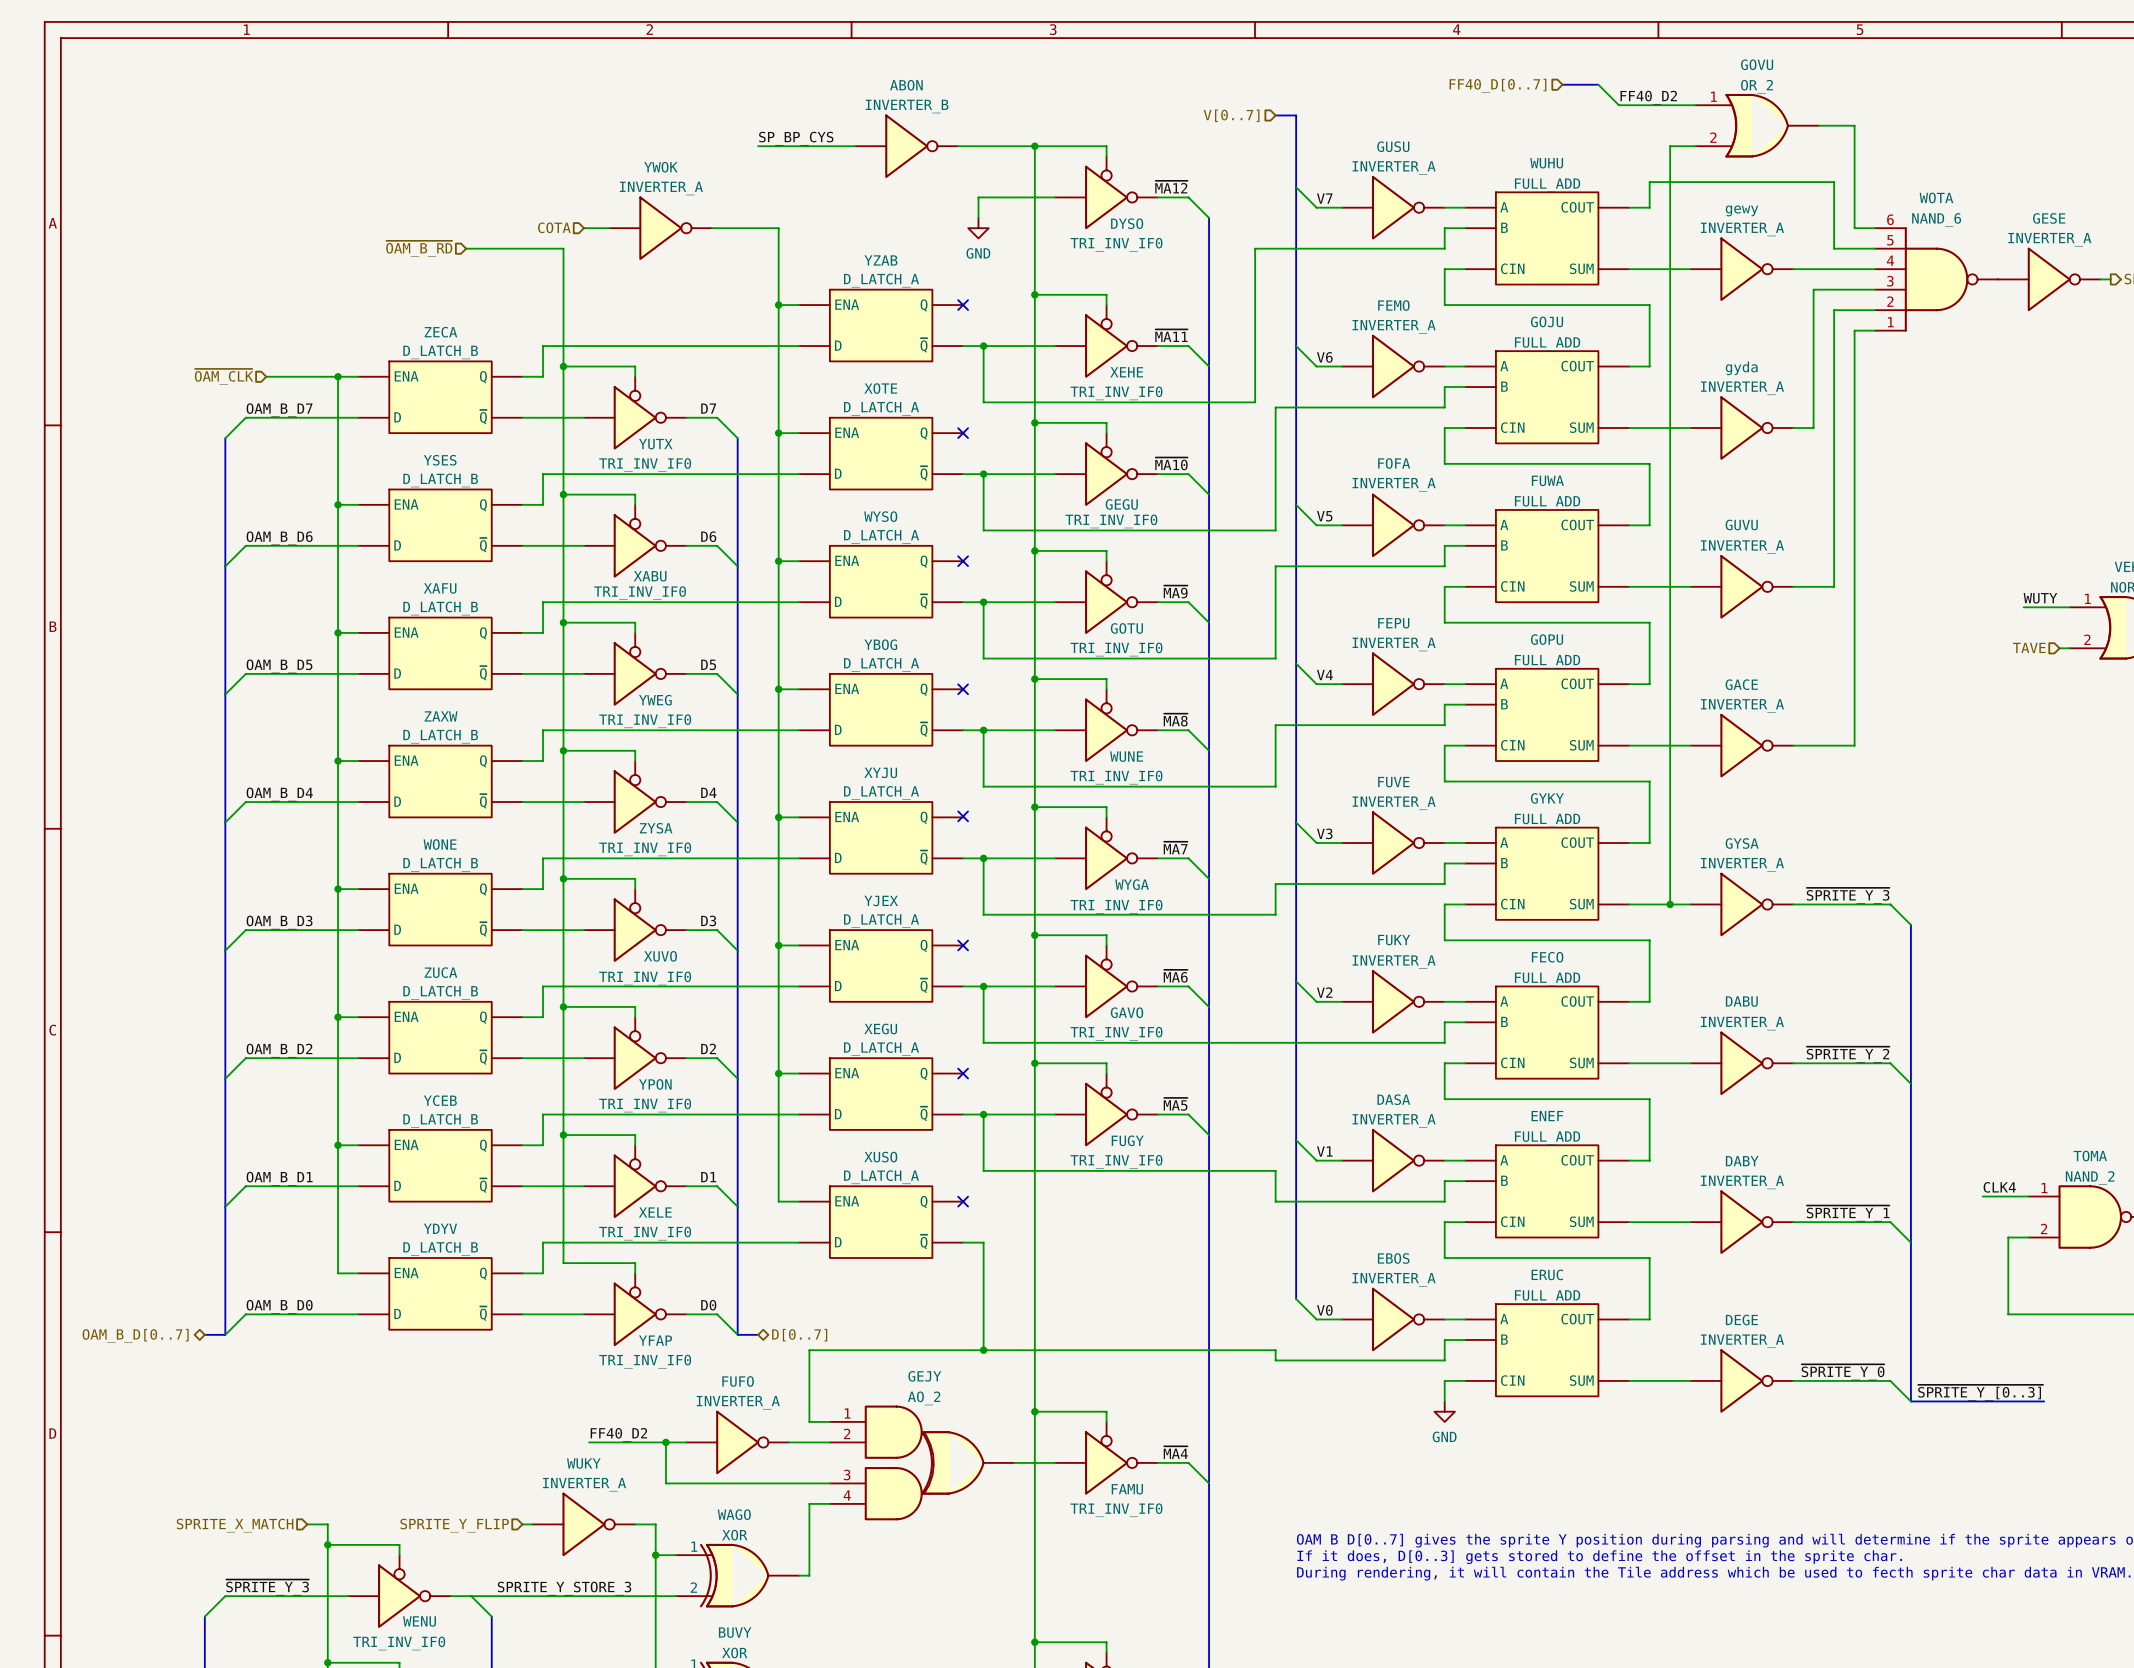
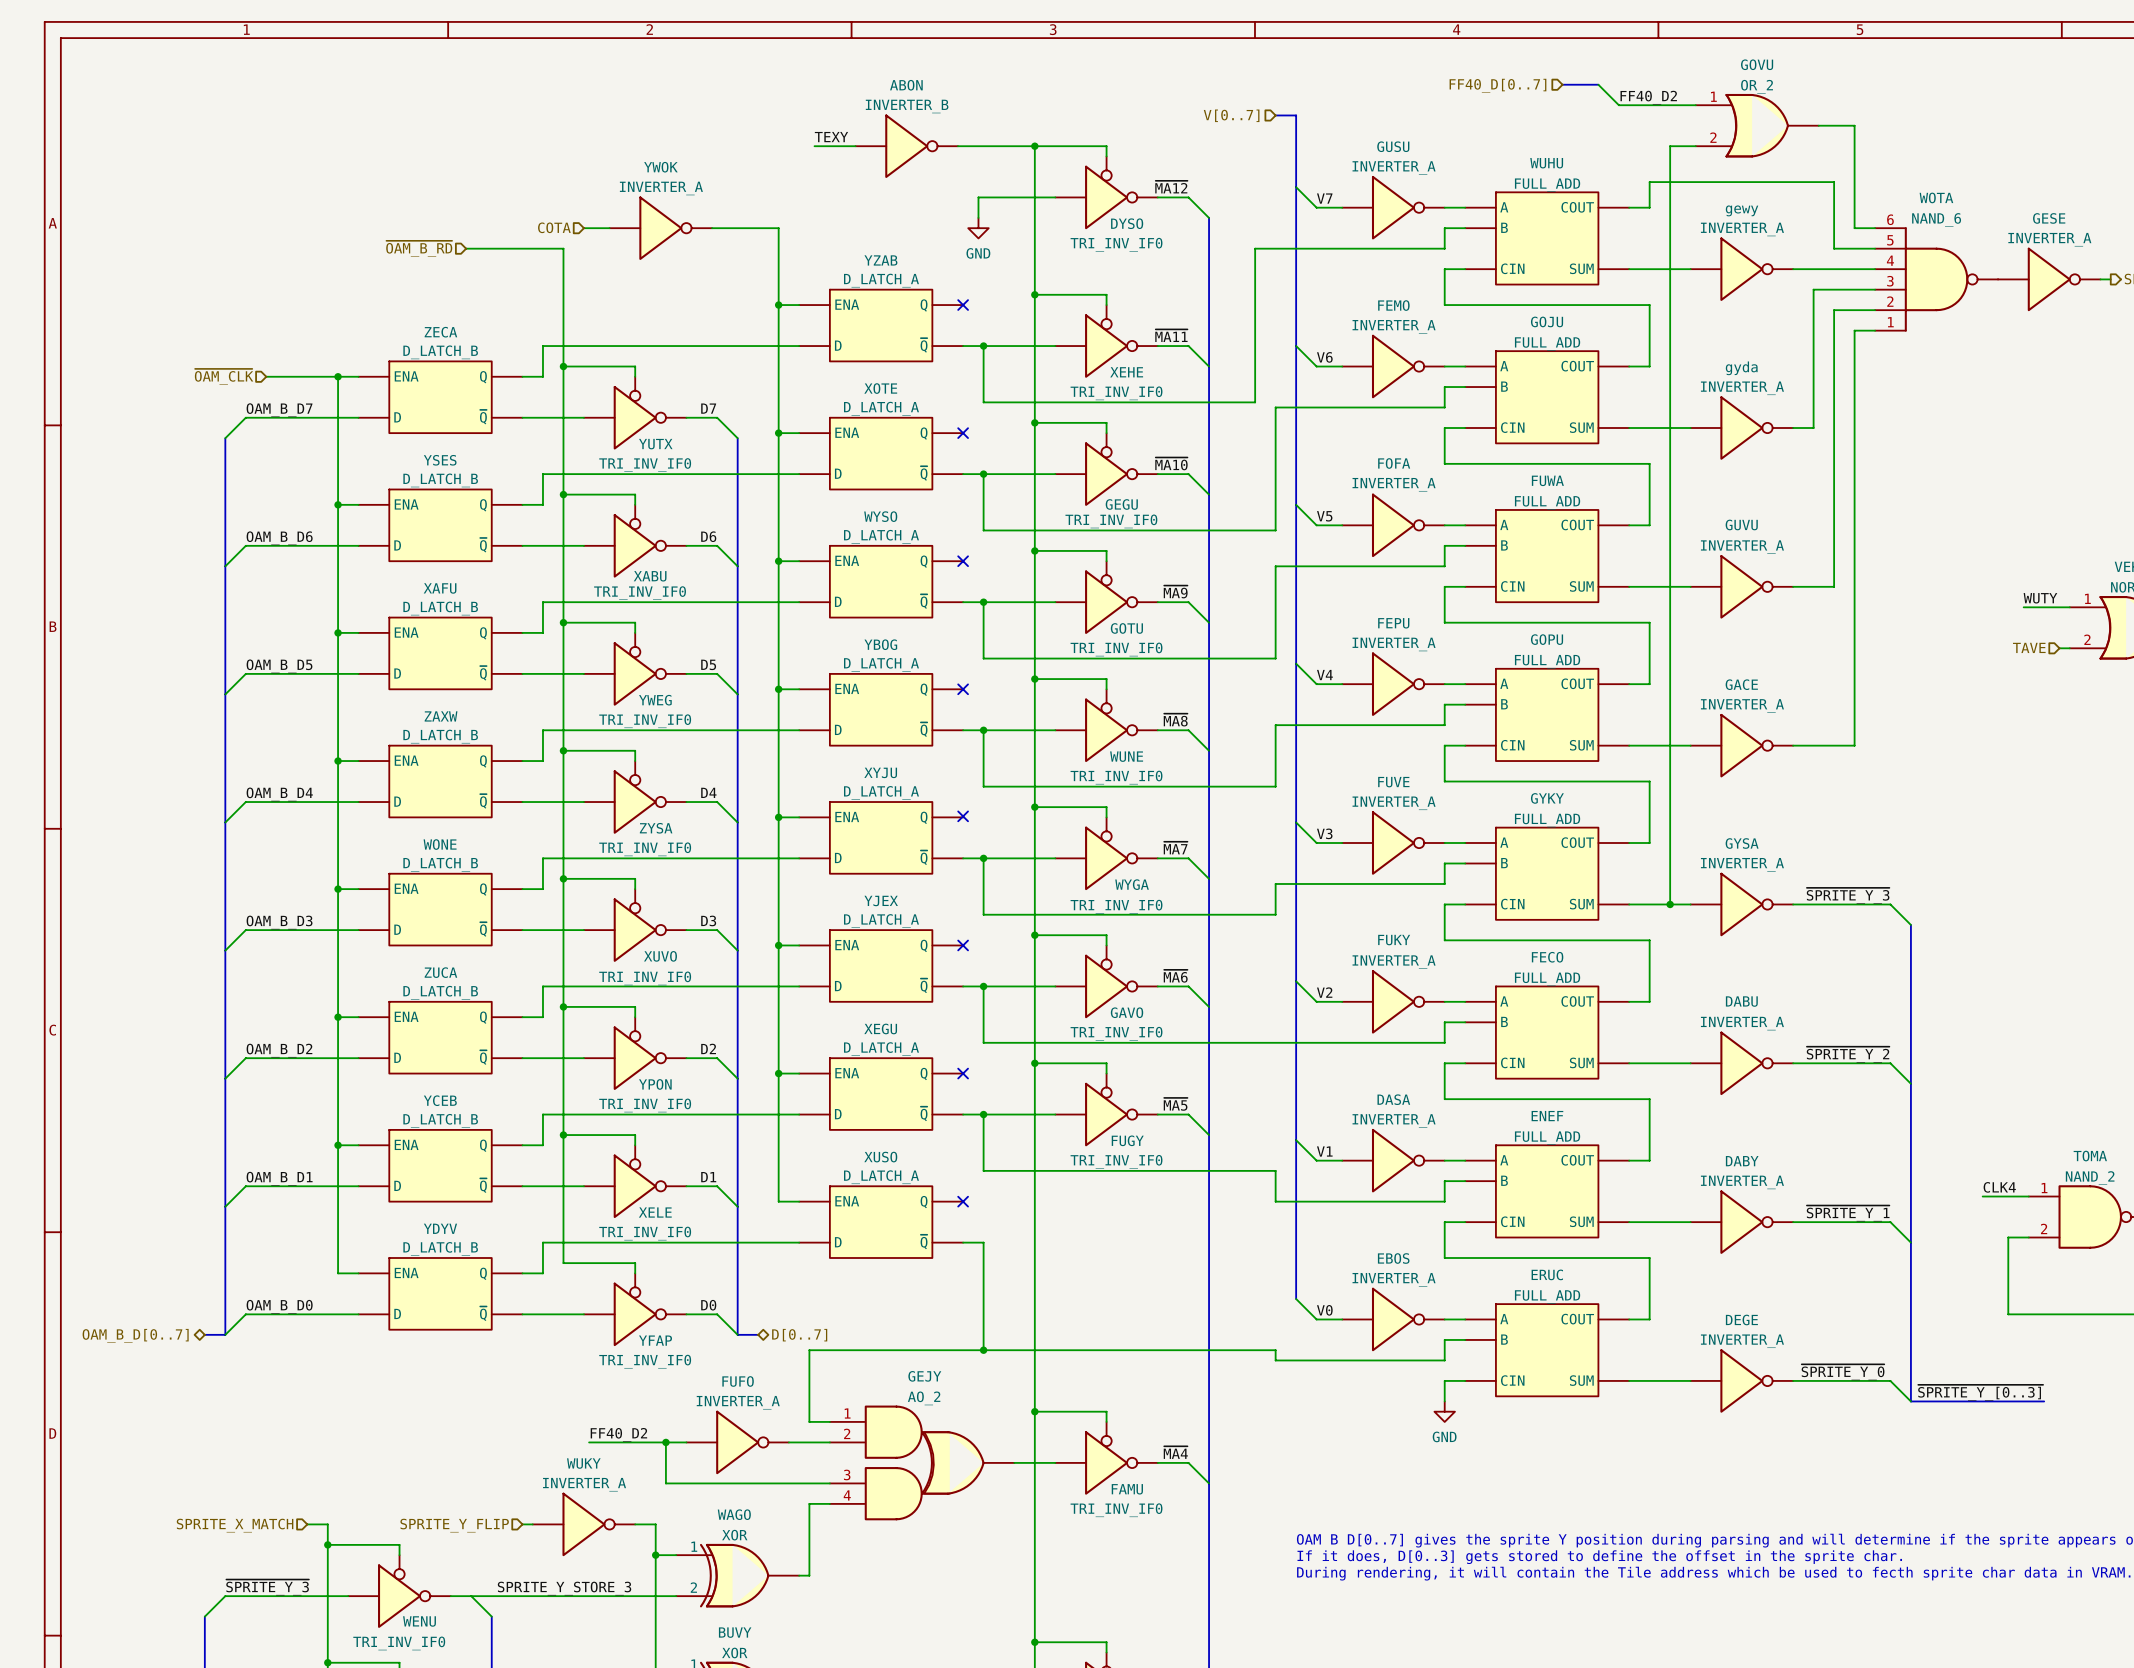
label: none -> TEXY (831, 137)
label: SP_BP_CYS (796, 138) -> none
wire: (758, 146) (814, 146) -> none

